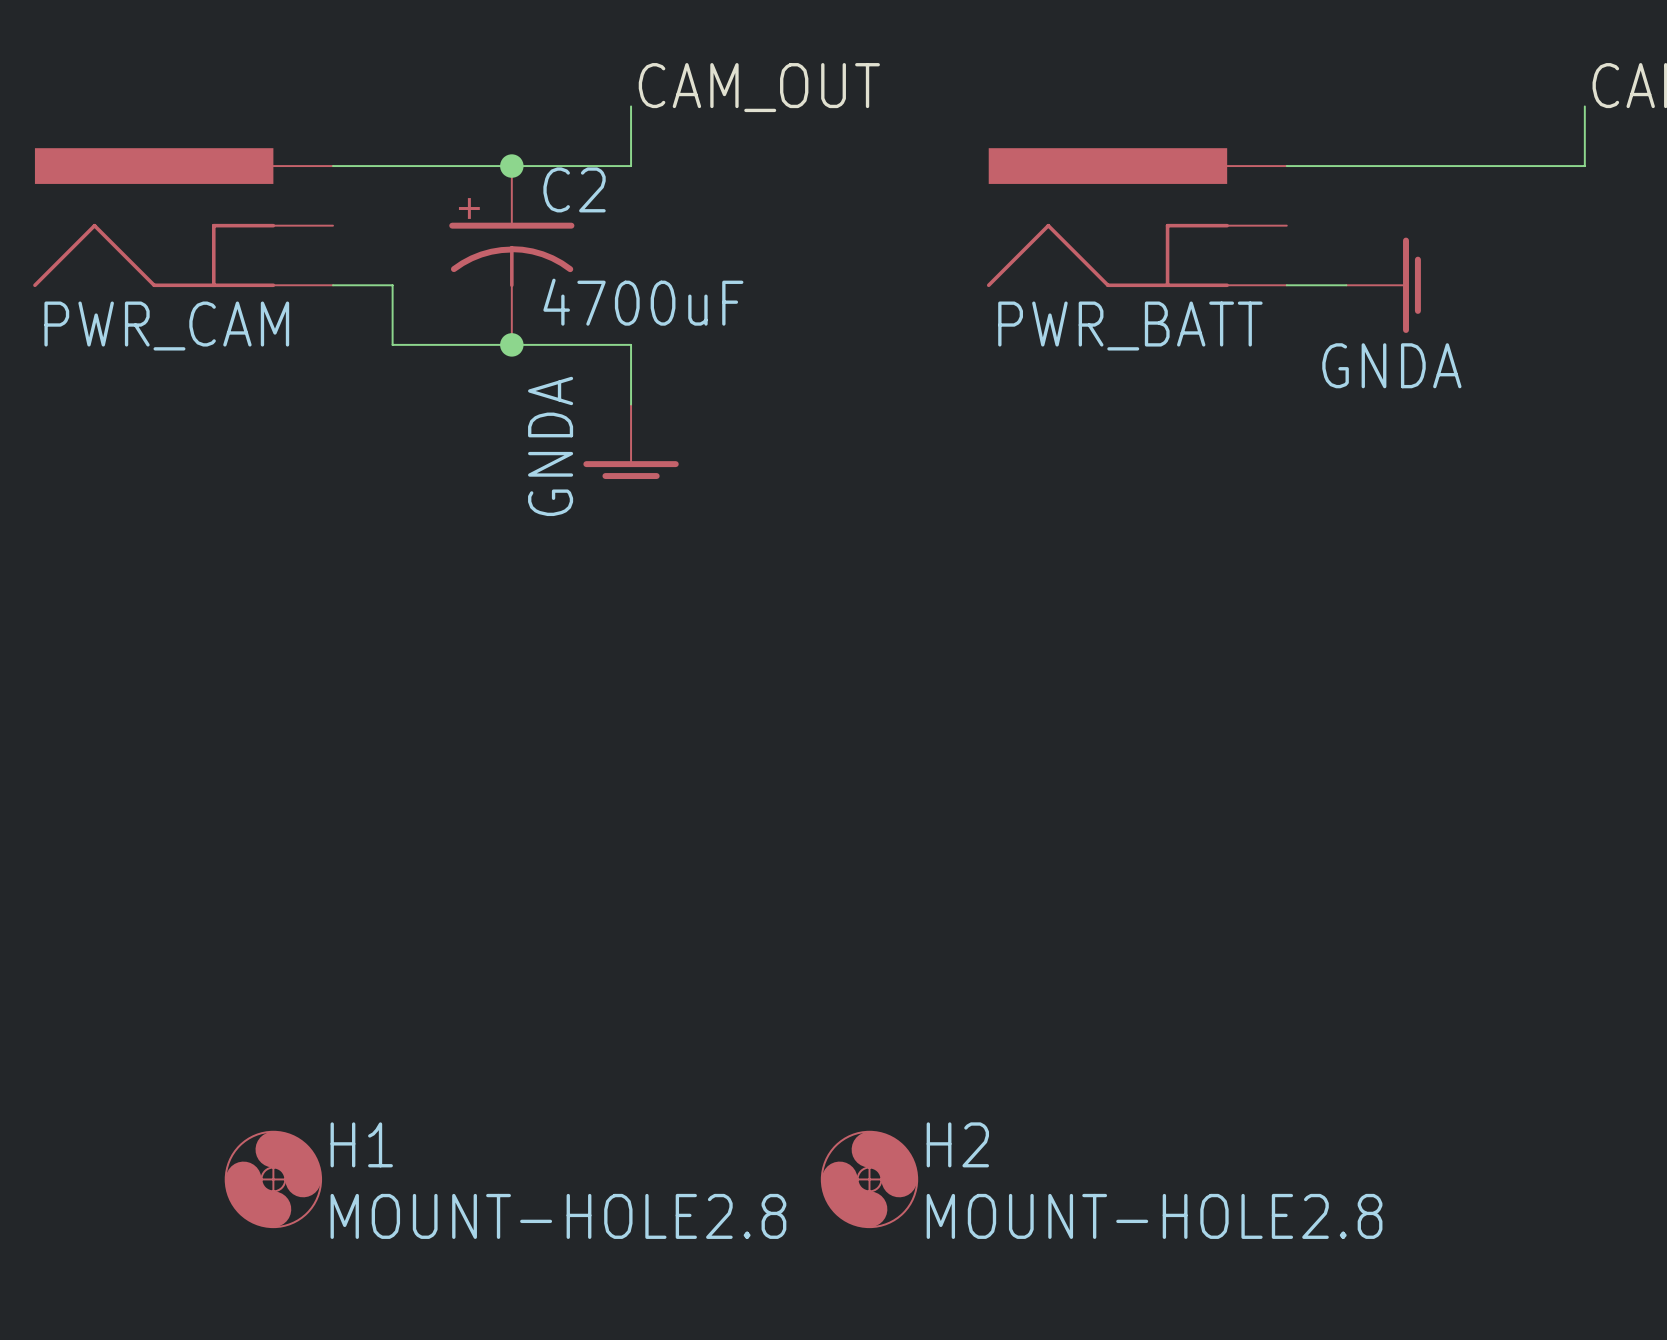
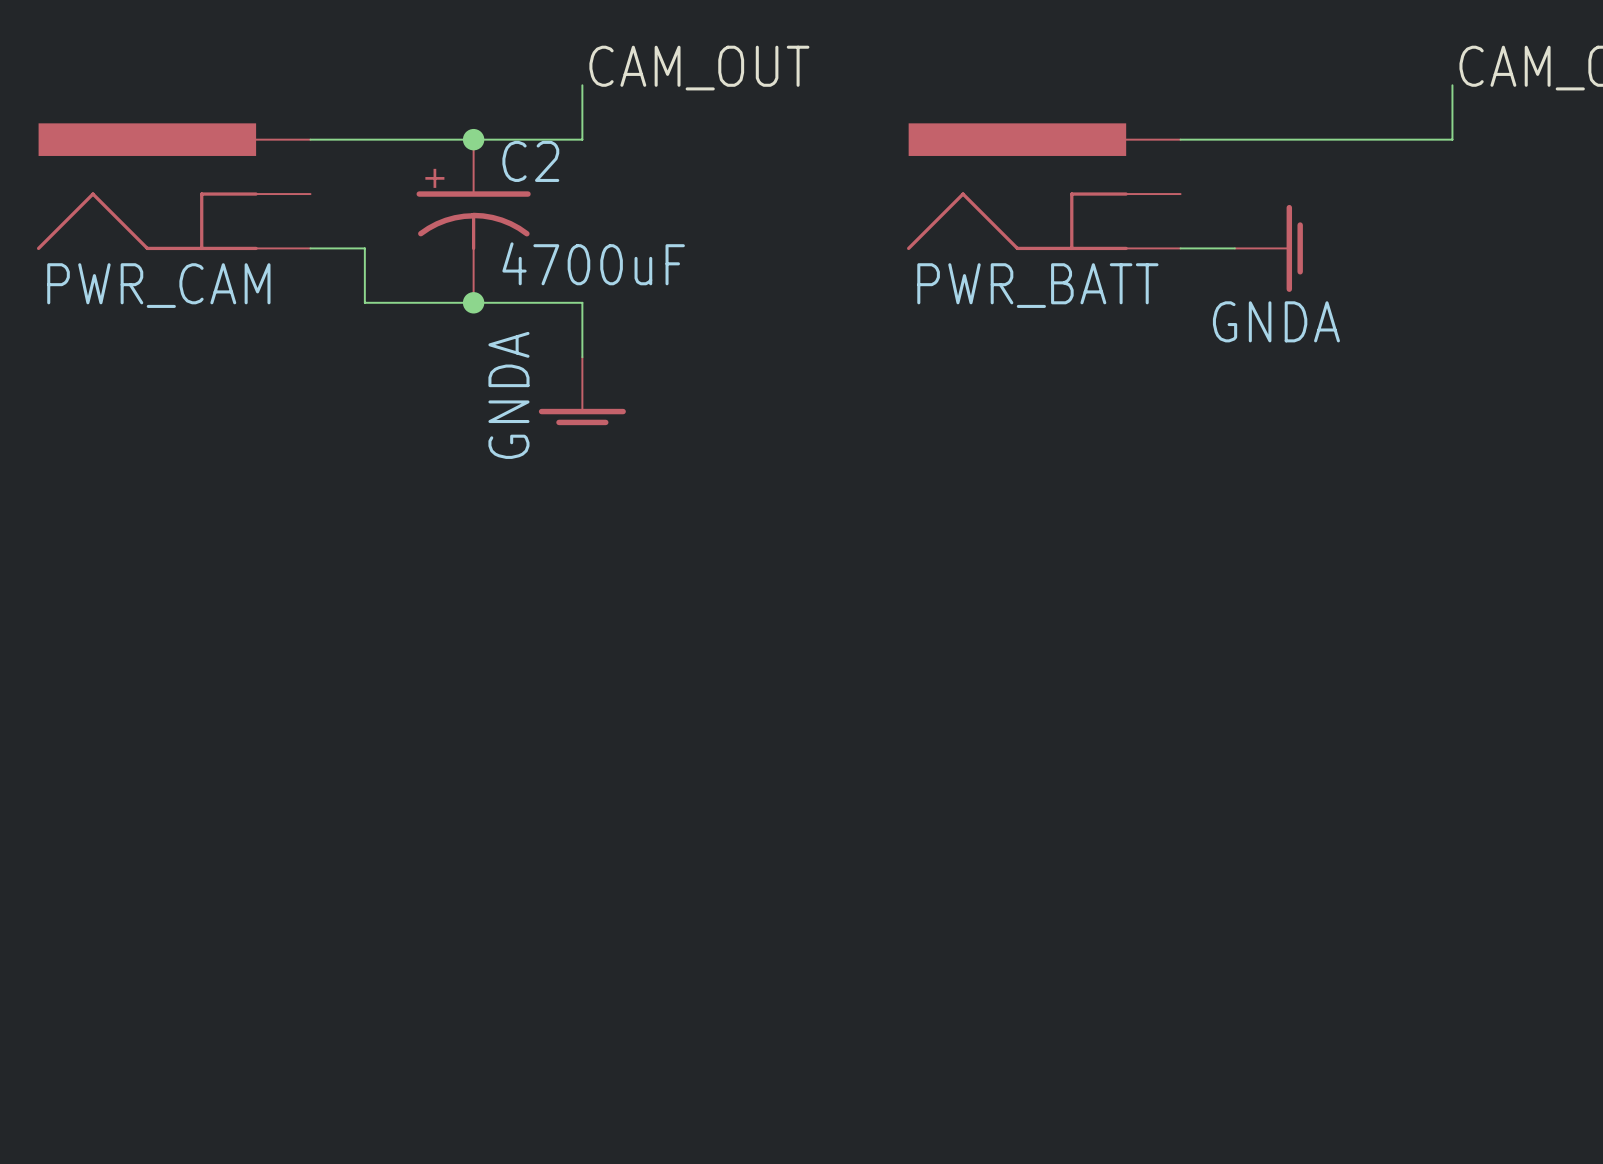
H1: MOUNT-HOLE2.8 (273, 1179) -> none
H2: MOUNT-HOLE2.8 (869, 1179) -> none

